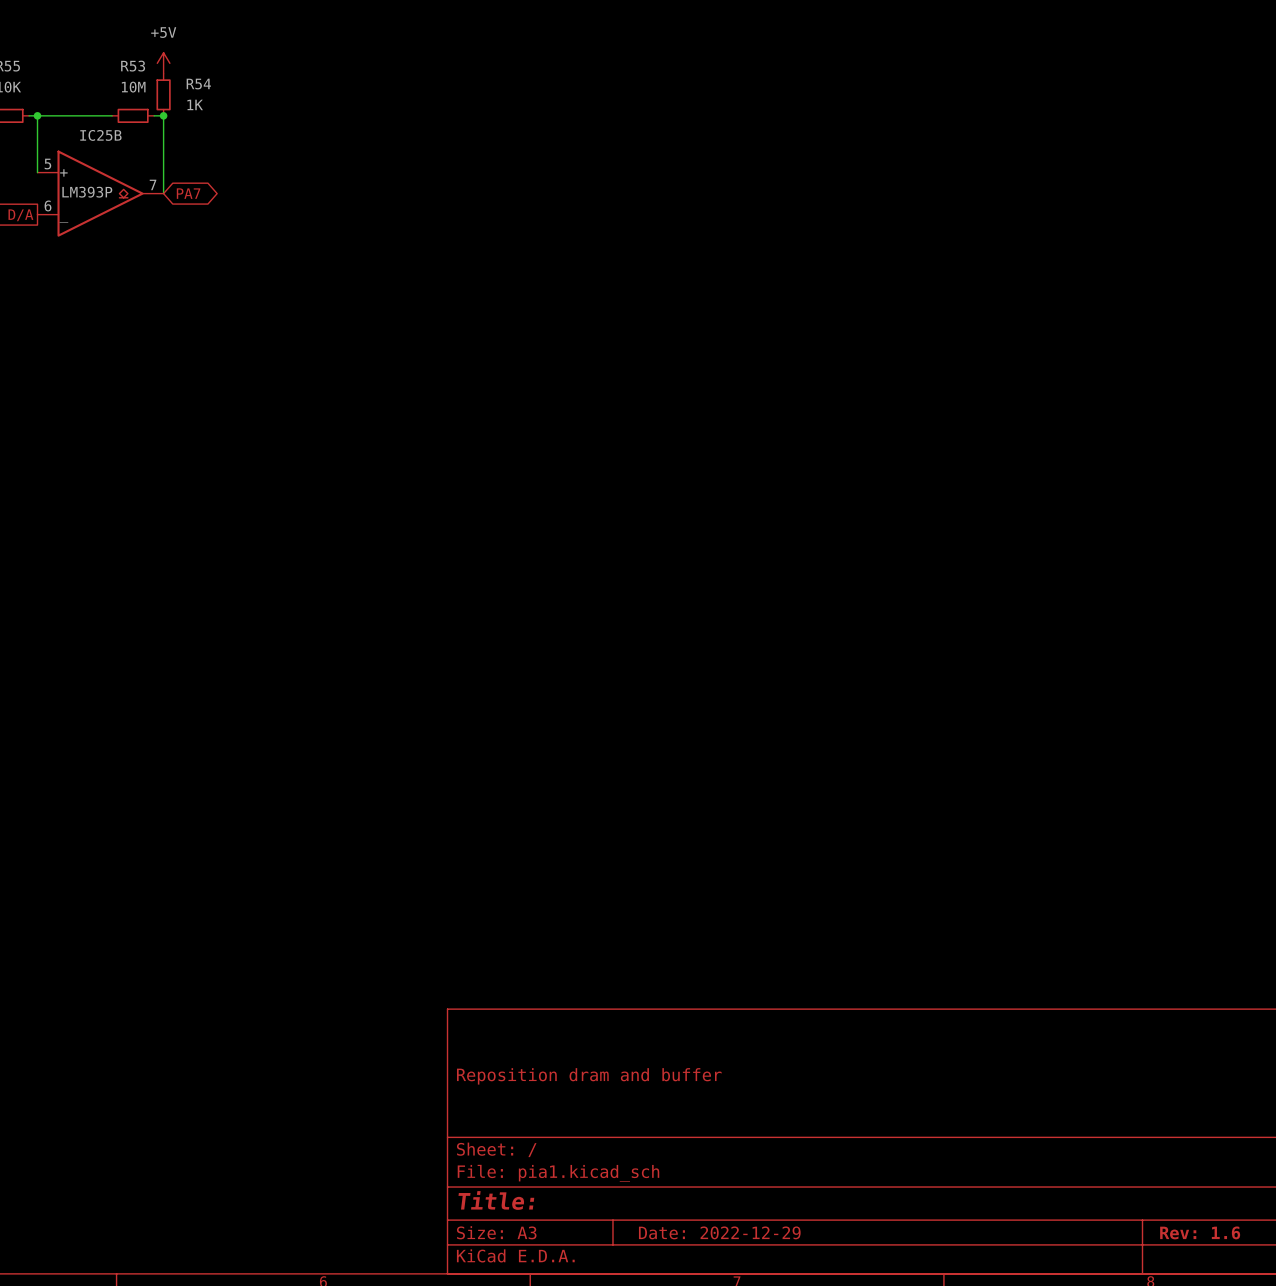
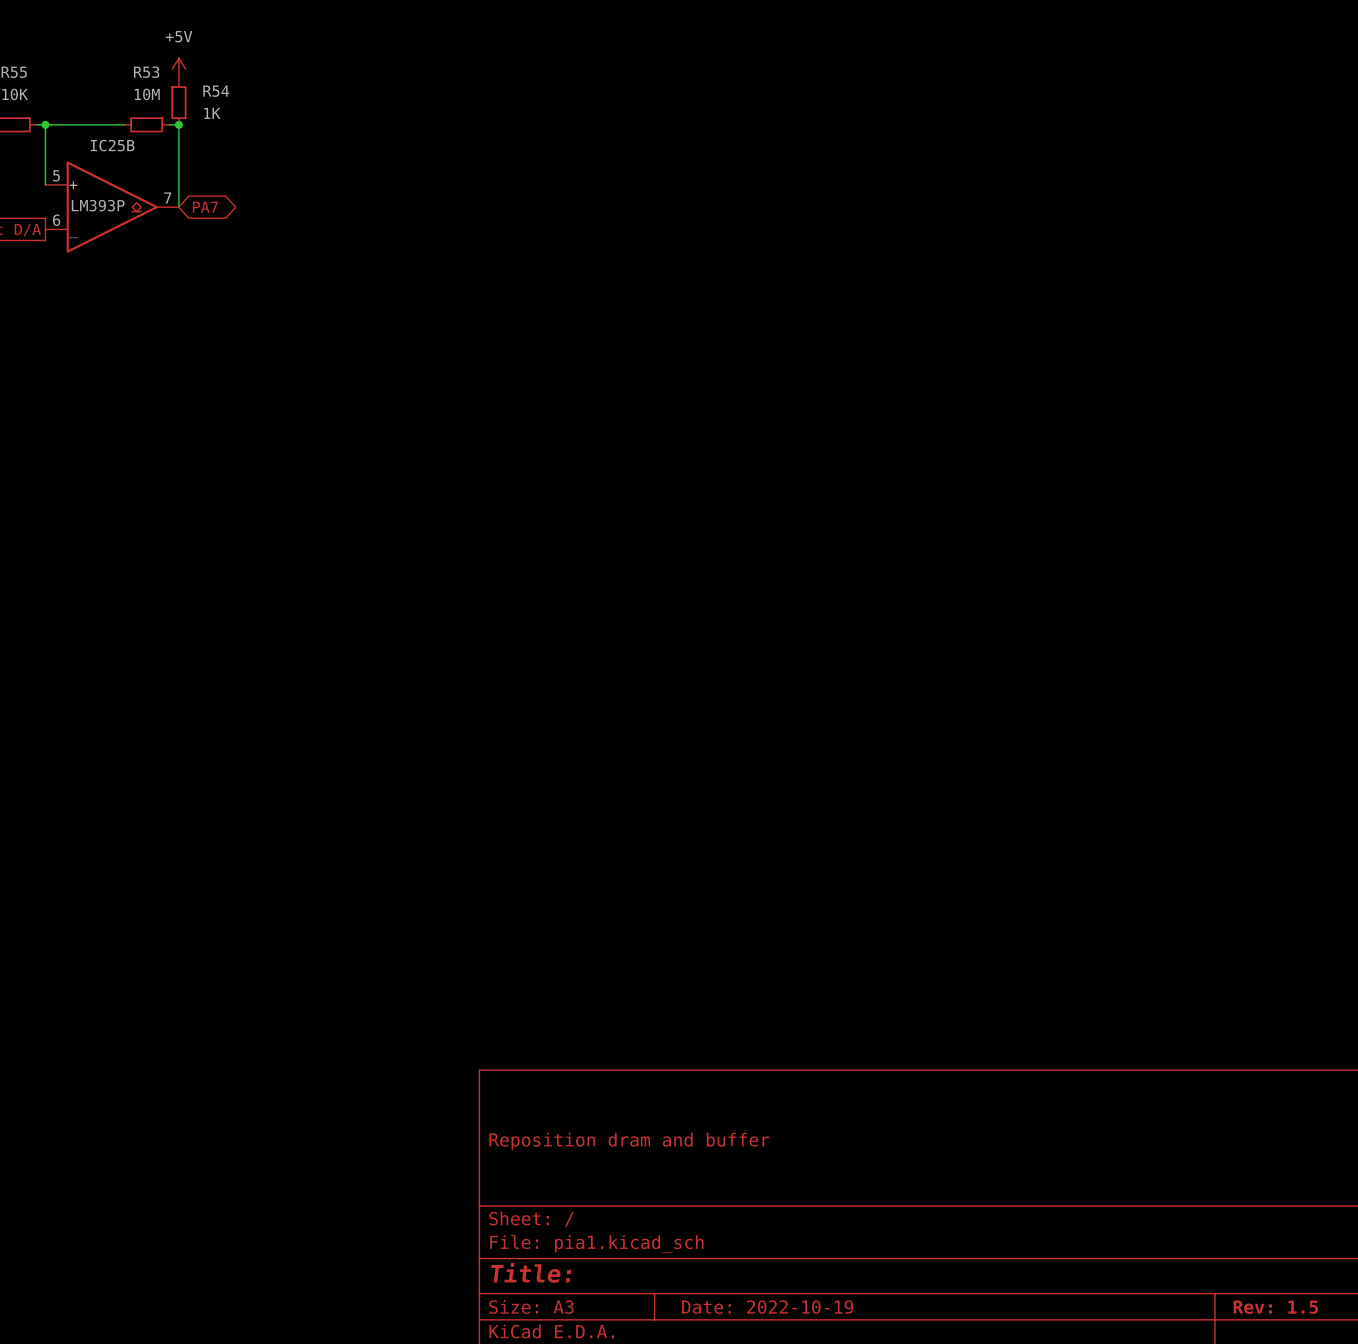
title block: Date: 2022-12-29 (719, 1232) -> Date: 2022-10-19 (767, 1307)
title block: Rev: 1.6 (1200, 1232) -> Rev: 1.5 (1275, 1307)

